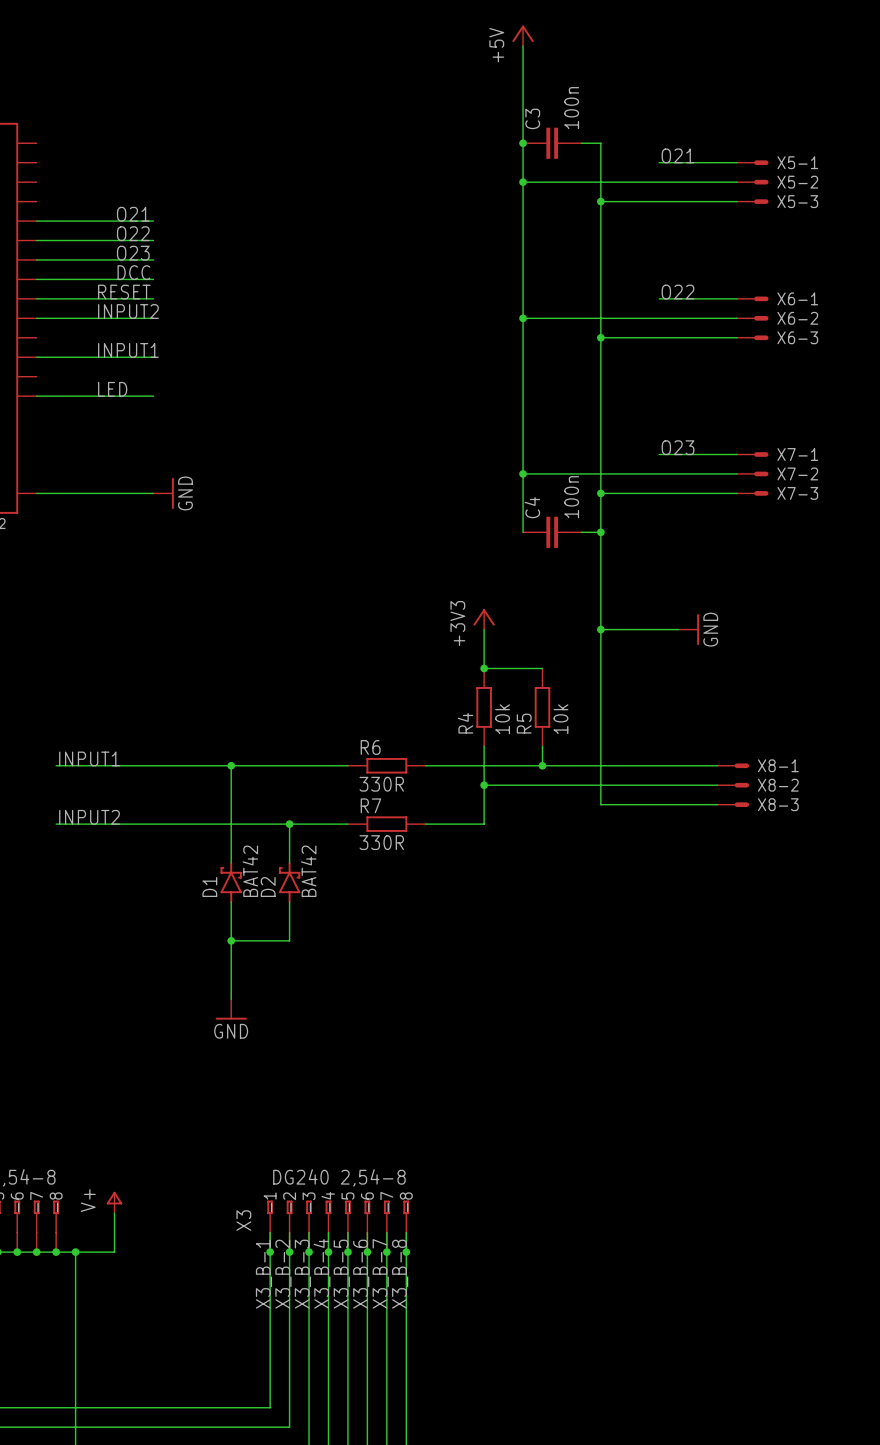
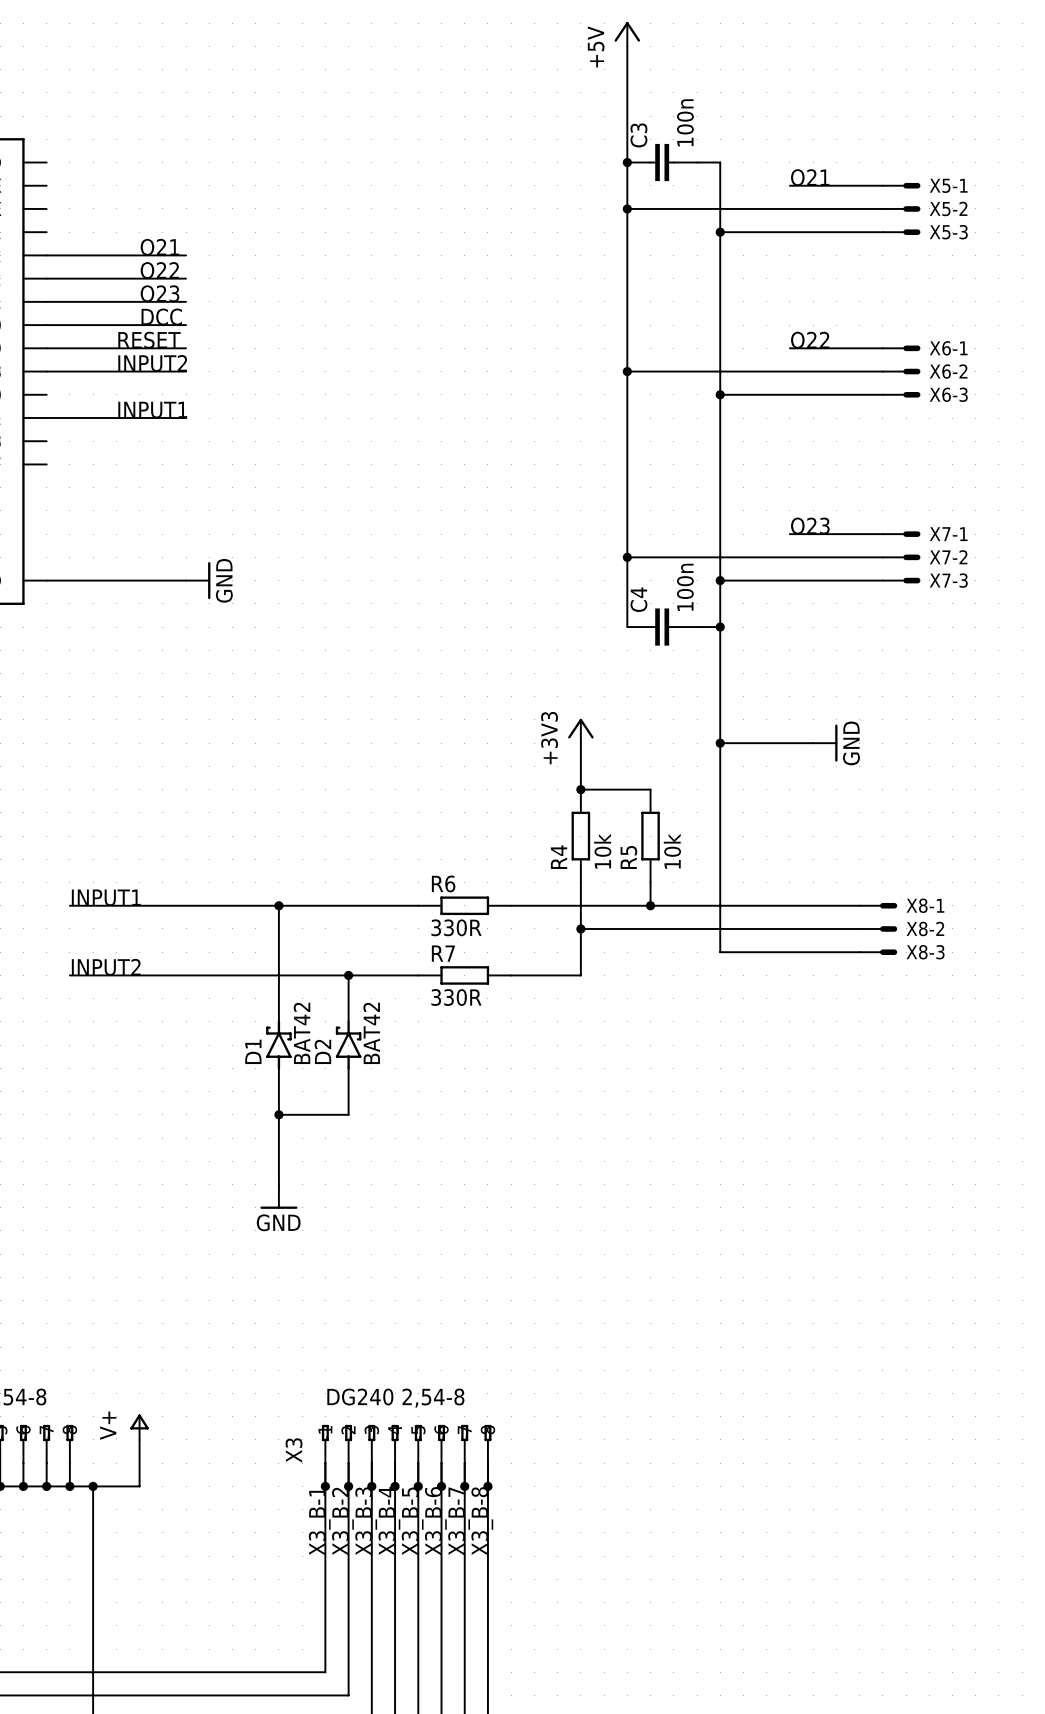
label: LED (112, 389) -> none
wire: (36, 396) (153, 396) -> none

